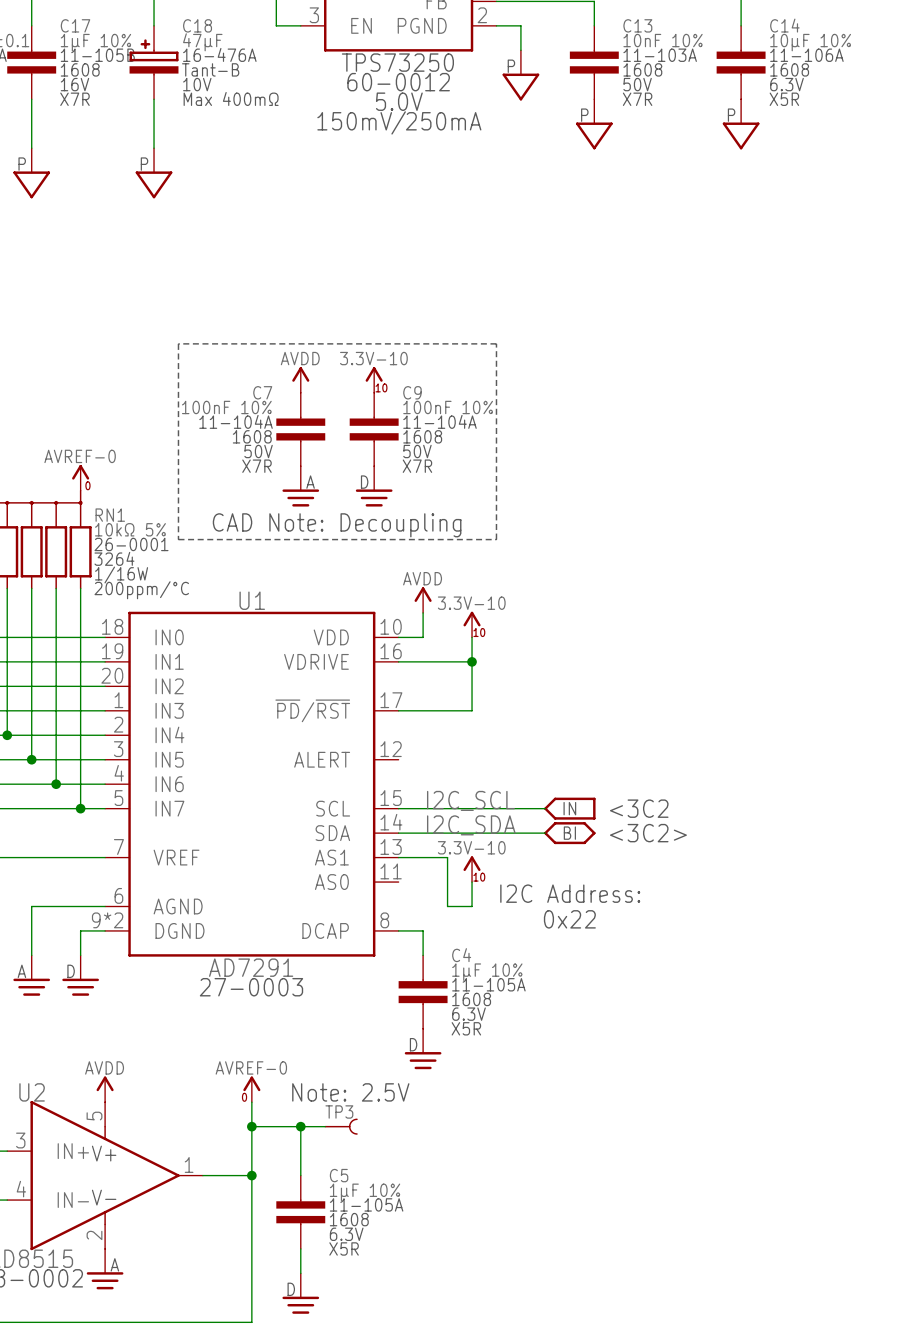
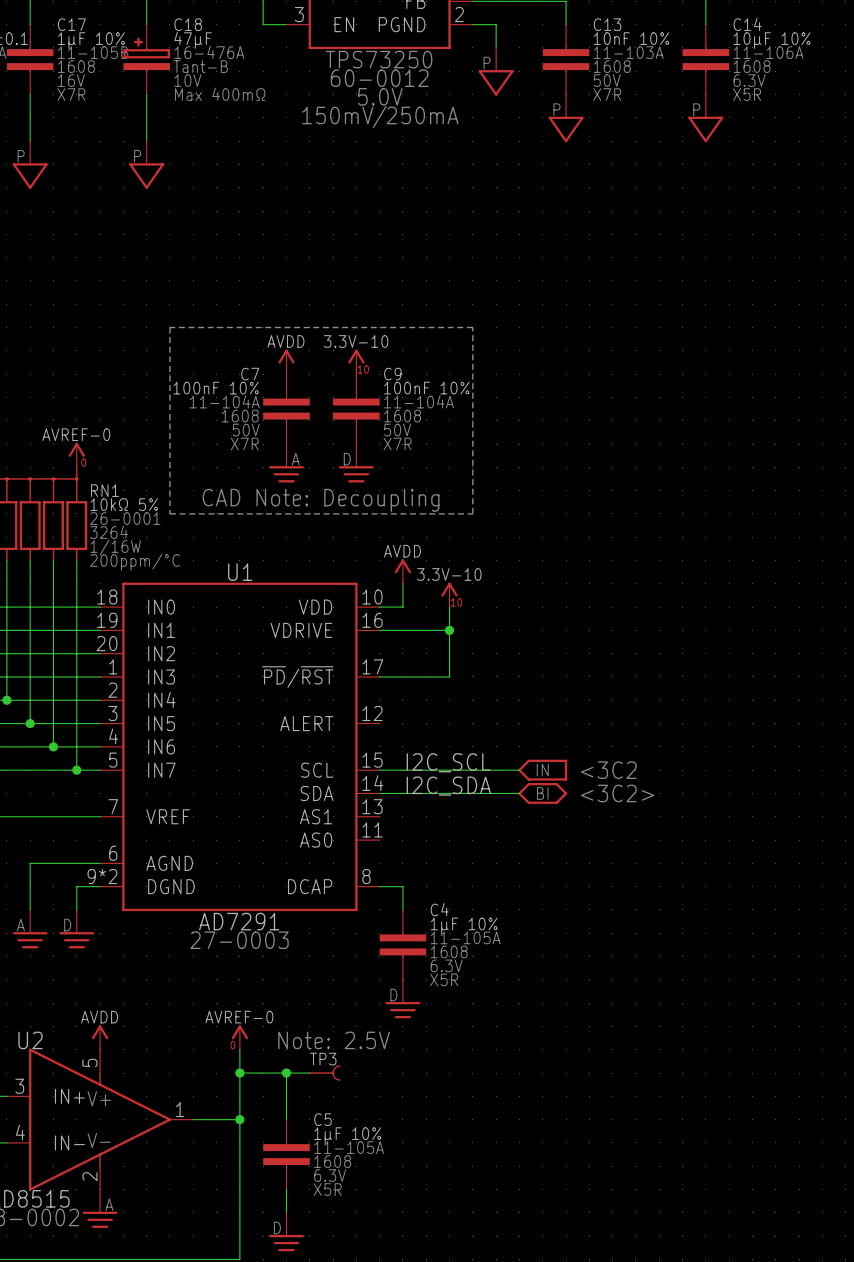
wire: (398, 857) (447, 857) (447, 906) (472, 906) (472, 882) -> none
power symbol: 3.3V-10 (472, 869) -> none
text: I2C Address: (570, 893) -> none
text: 0x22 (569, 919) -> none

